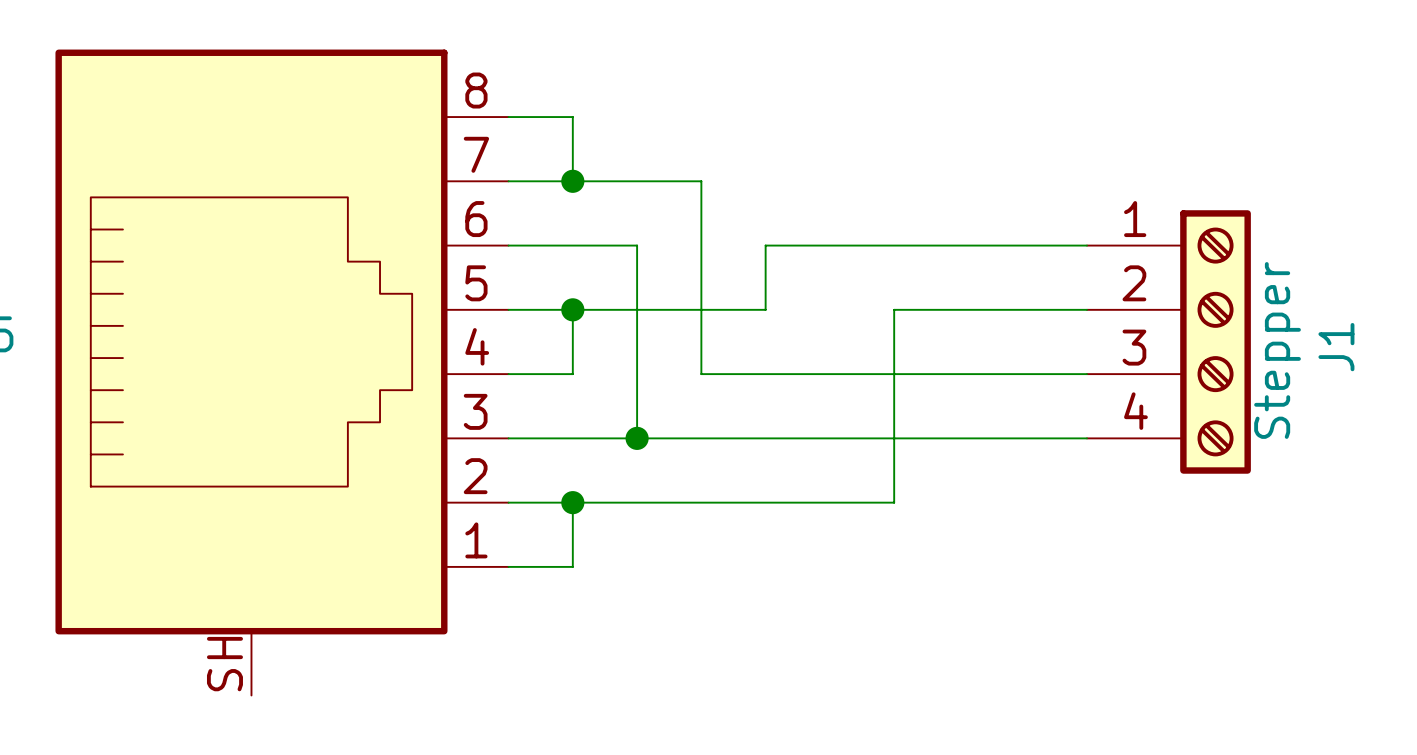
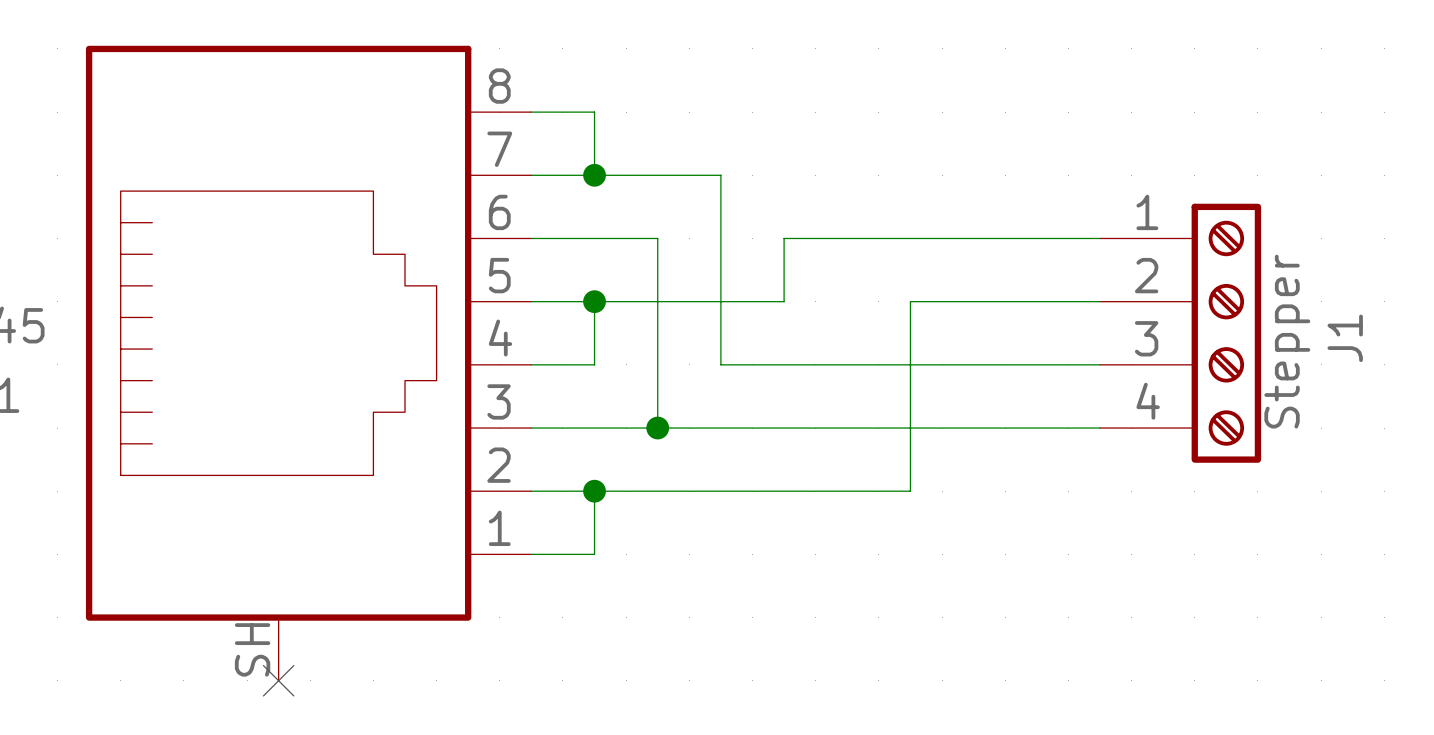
no-connect mark: none -> (278, 680)

